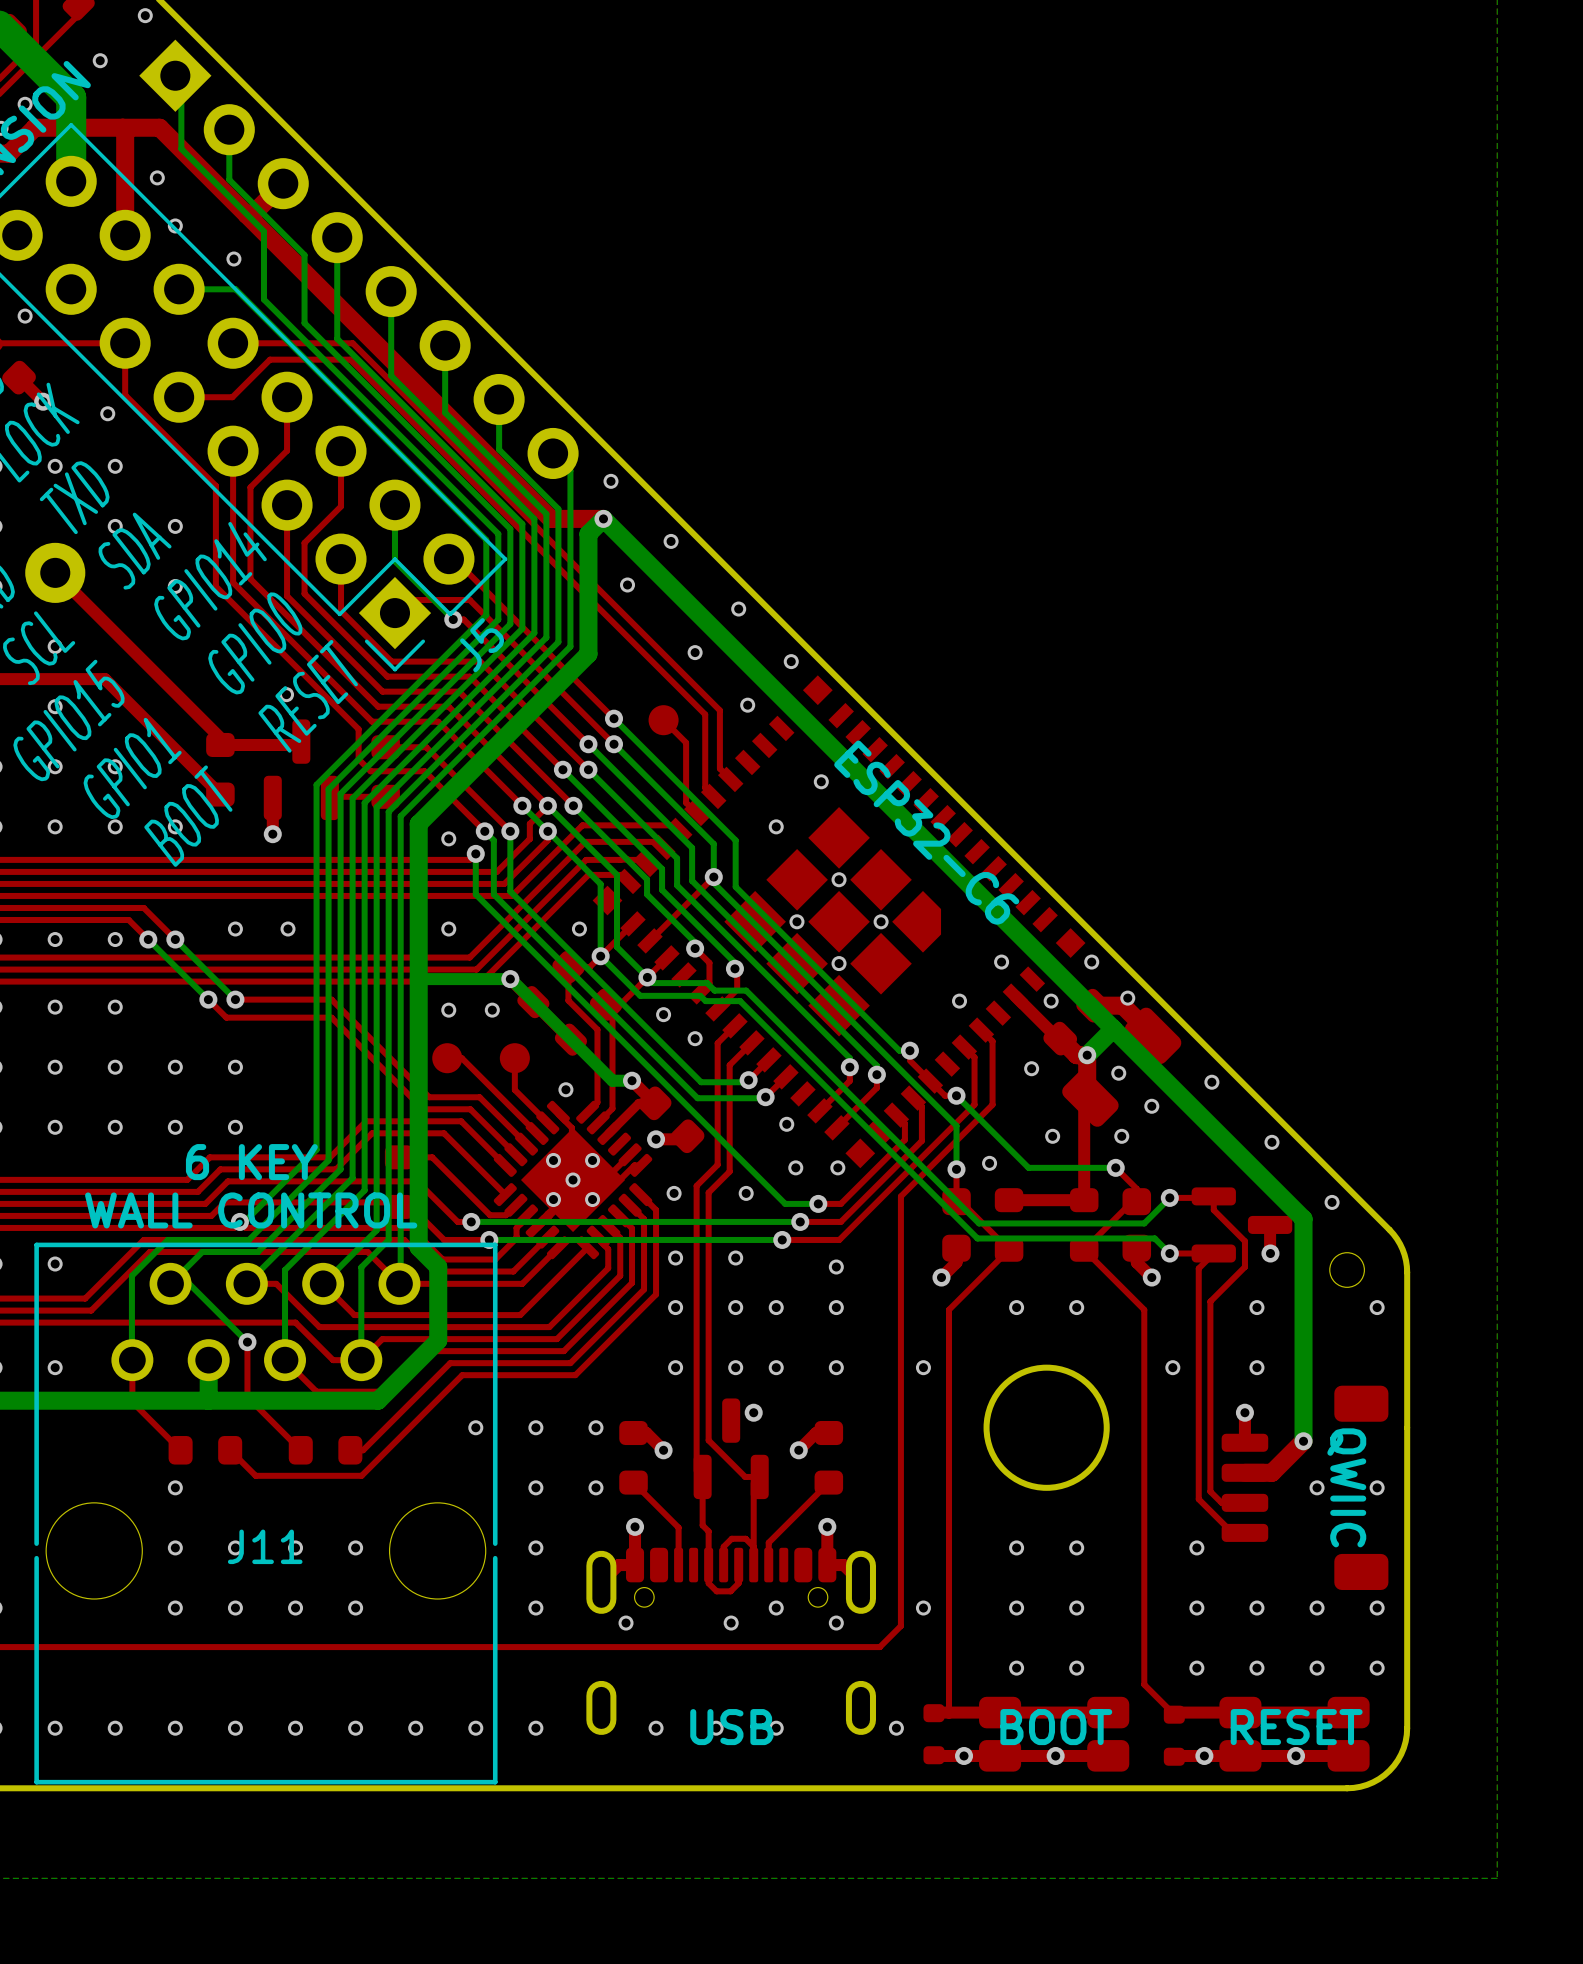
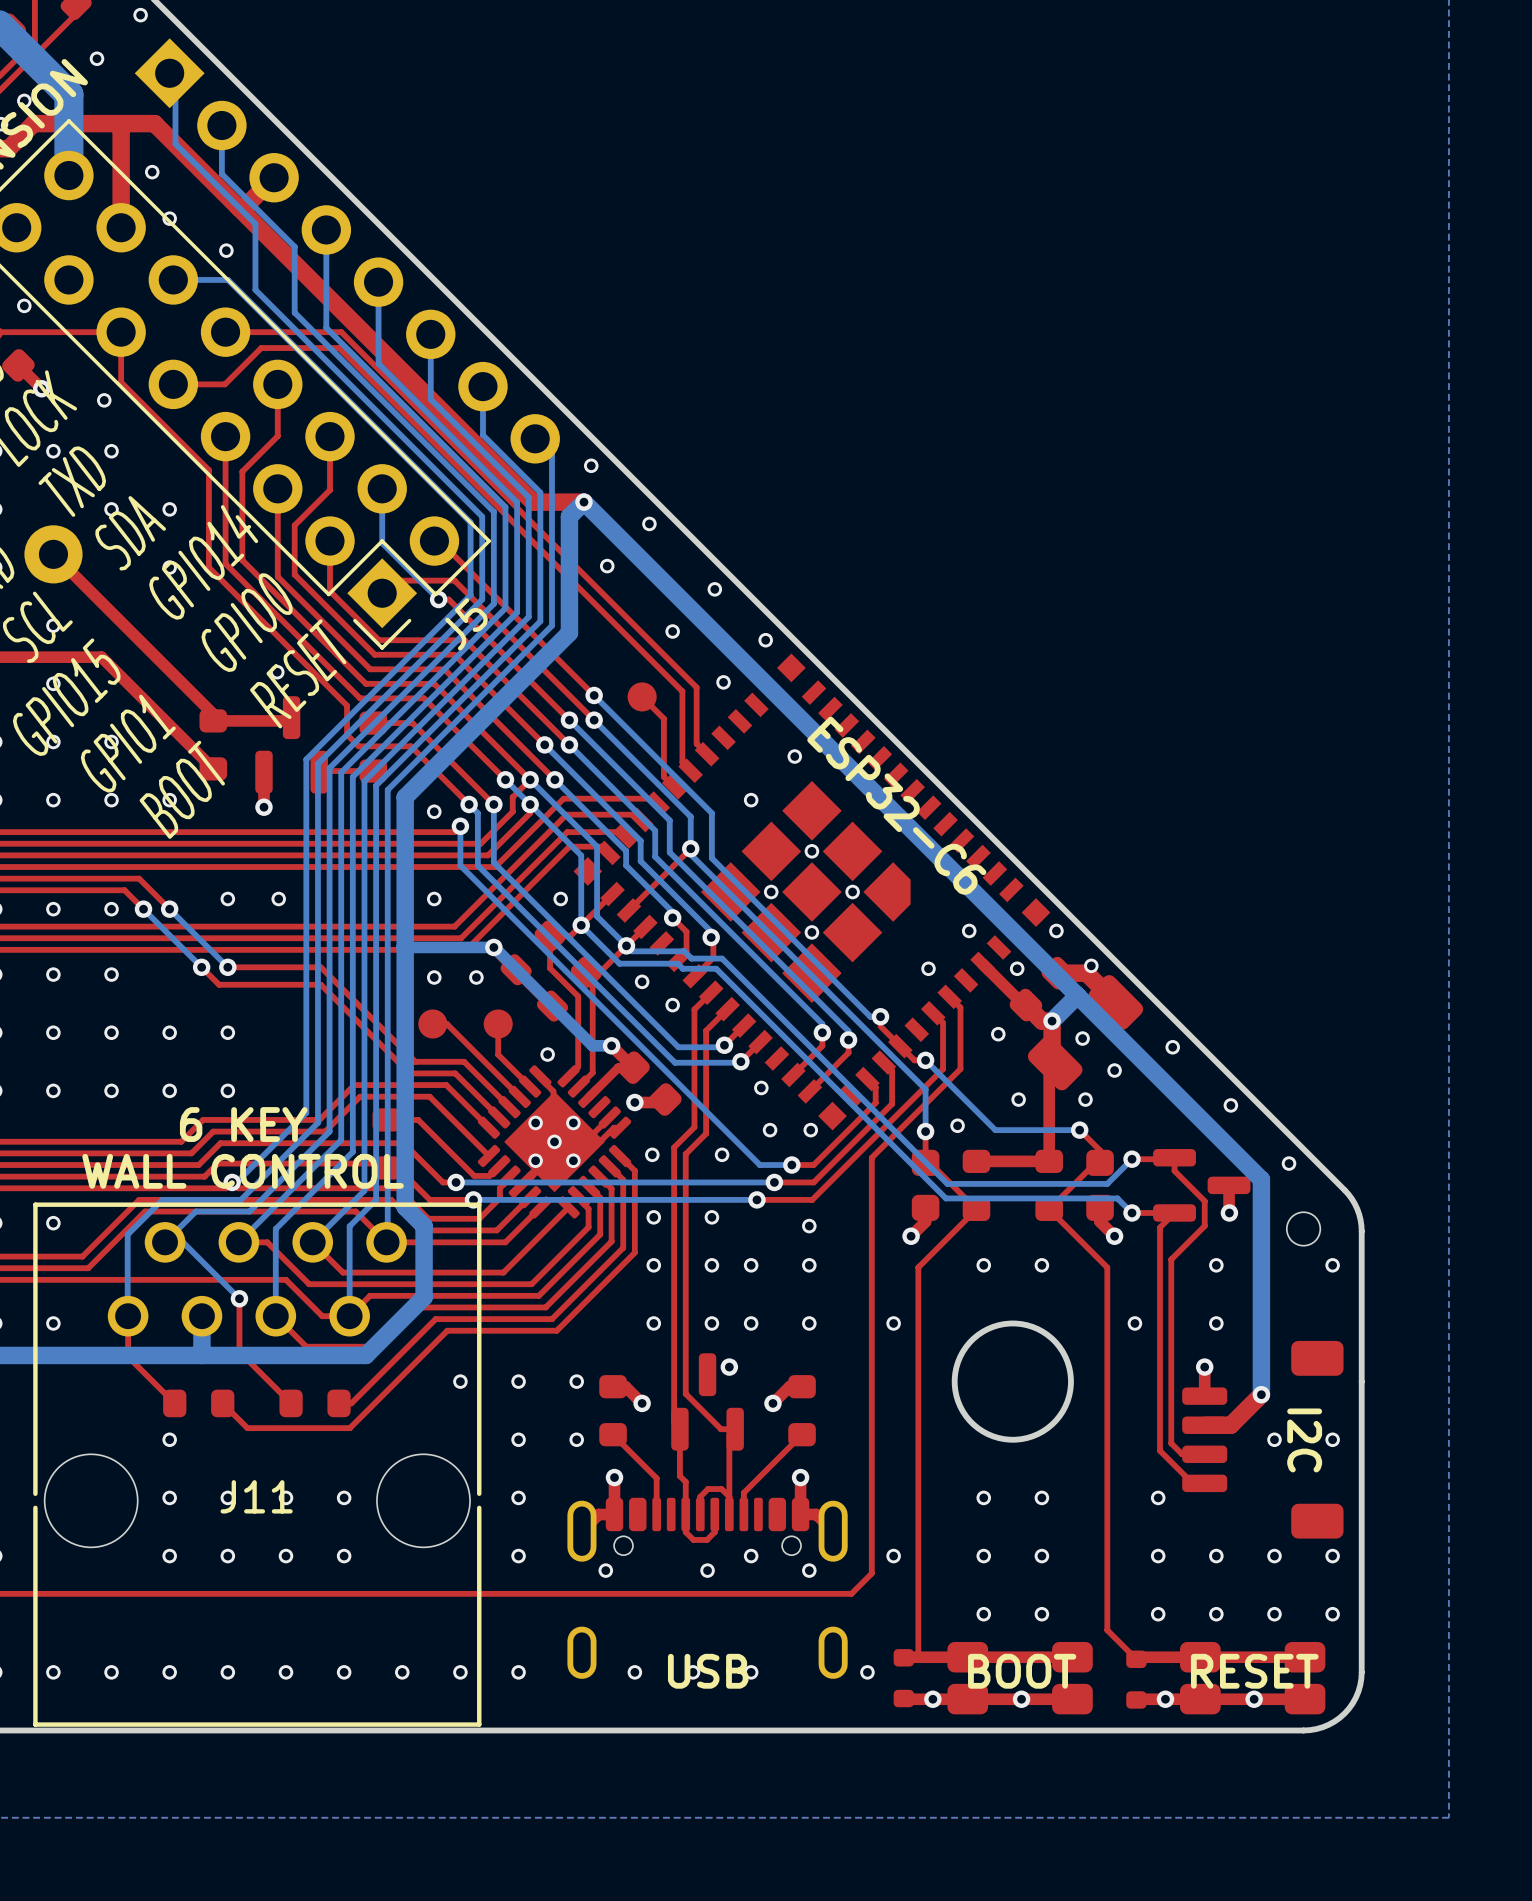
text: QWIIC (1346, 1487) -> I2C (1304, 1440)

